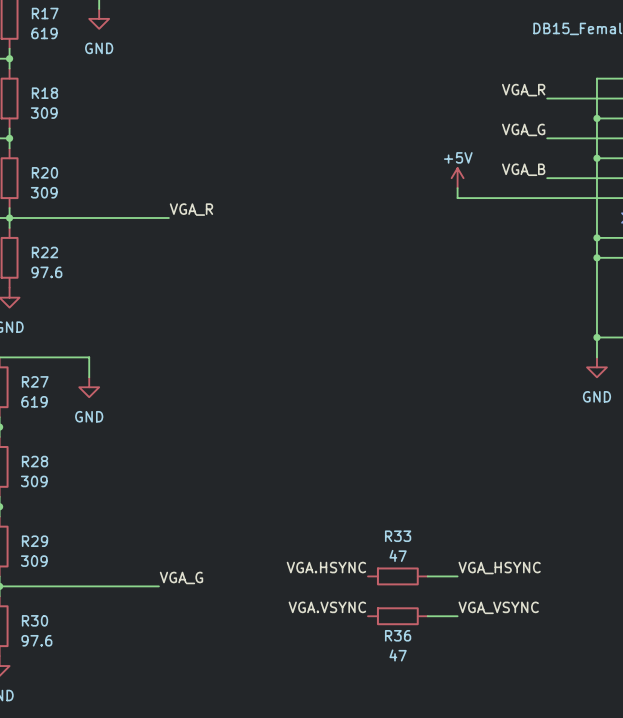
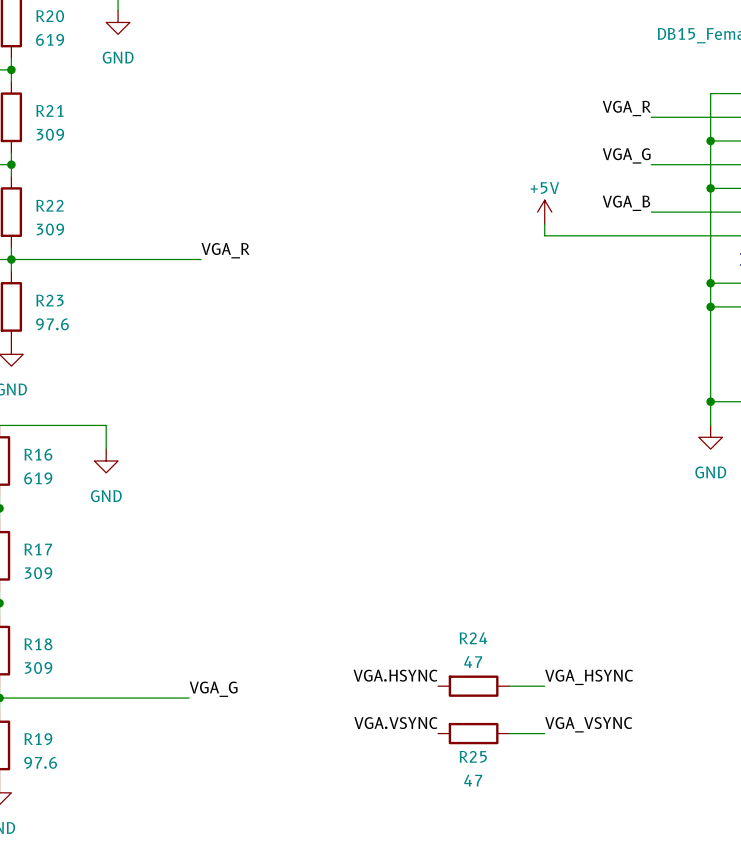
R17 name: R17 (45, 13) -> R20 (50, 16)
R18 name: R18 (44, 93) -> R21 (49, 110)
R20 name: R20 (44, 172) -> R22 (49, 205)
R22 name: R22 (44, 252) -> R23 (49, 300)
R27 name: R27 (35, 381) -> R16 (38, 454)
R28 name: R28 (35, 461) -> R17 (38, 549)
R33 name: R33 (398, 536) -> R24 (473, 638)
R29 name: R29 (35, 541) -> R18 (38, 644)
R30 name: R30 (35, 620) -> R19 (38, 739)
R36 name: R36 (398, 635) -> R25 (473, 756)

